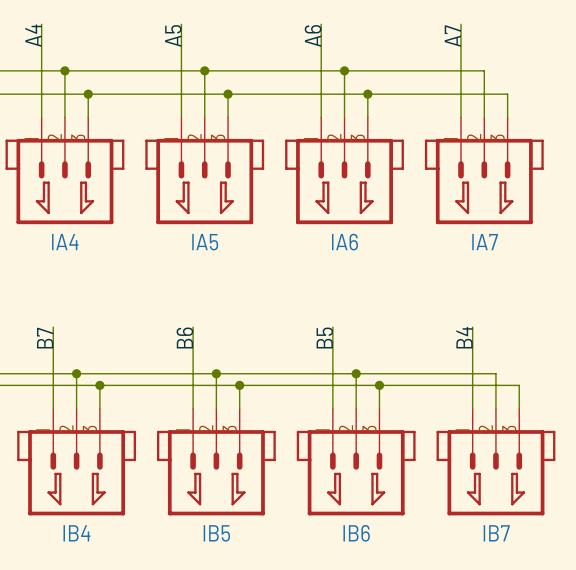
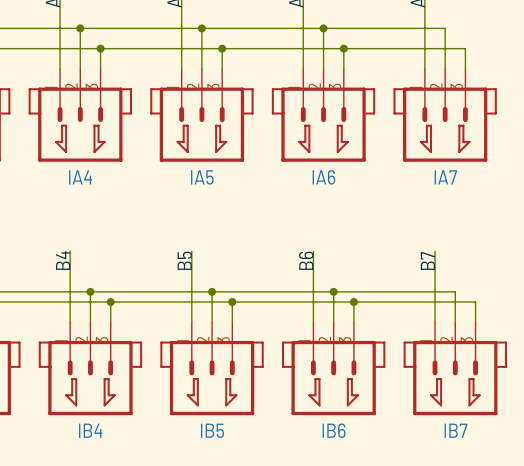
label: B4 (464, 337) -> B7 (427, 260)
label: B7 (45, 338) -> B4 (63, 260)
label: B6 (184, 338) -> B5 (184, 260)
label: B5 (324, 338) -> B6 (306, 260)

